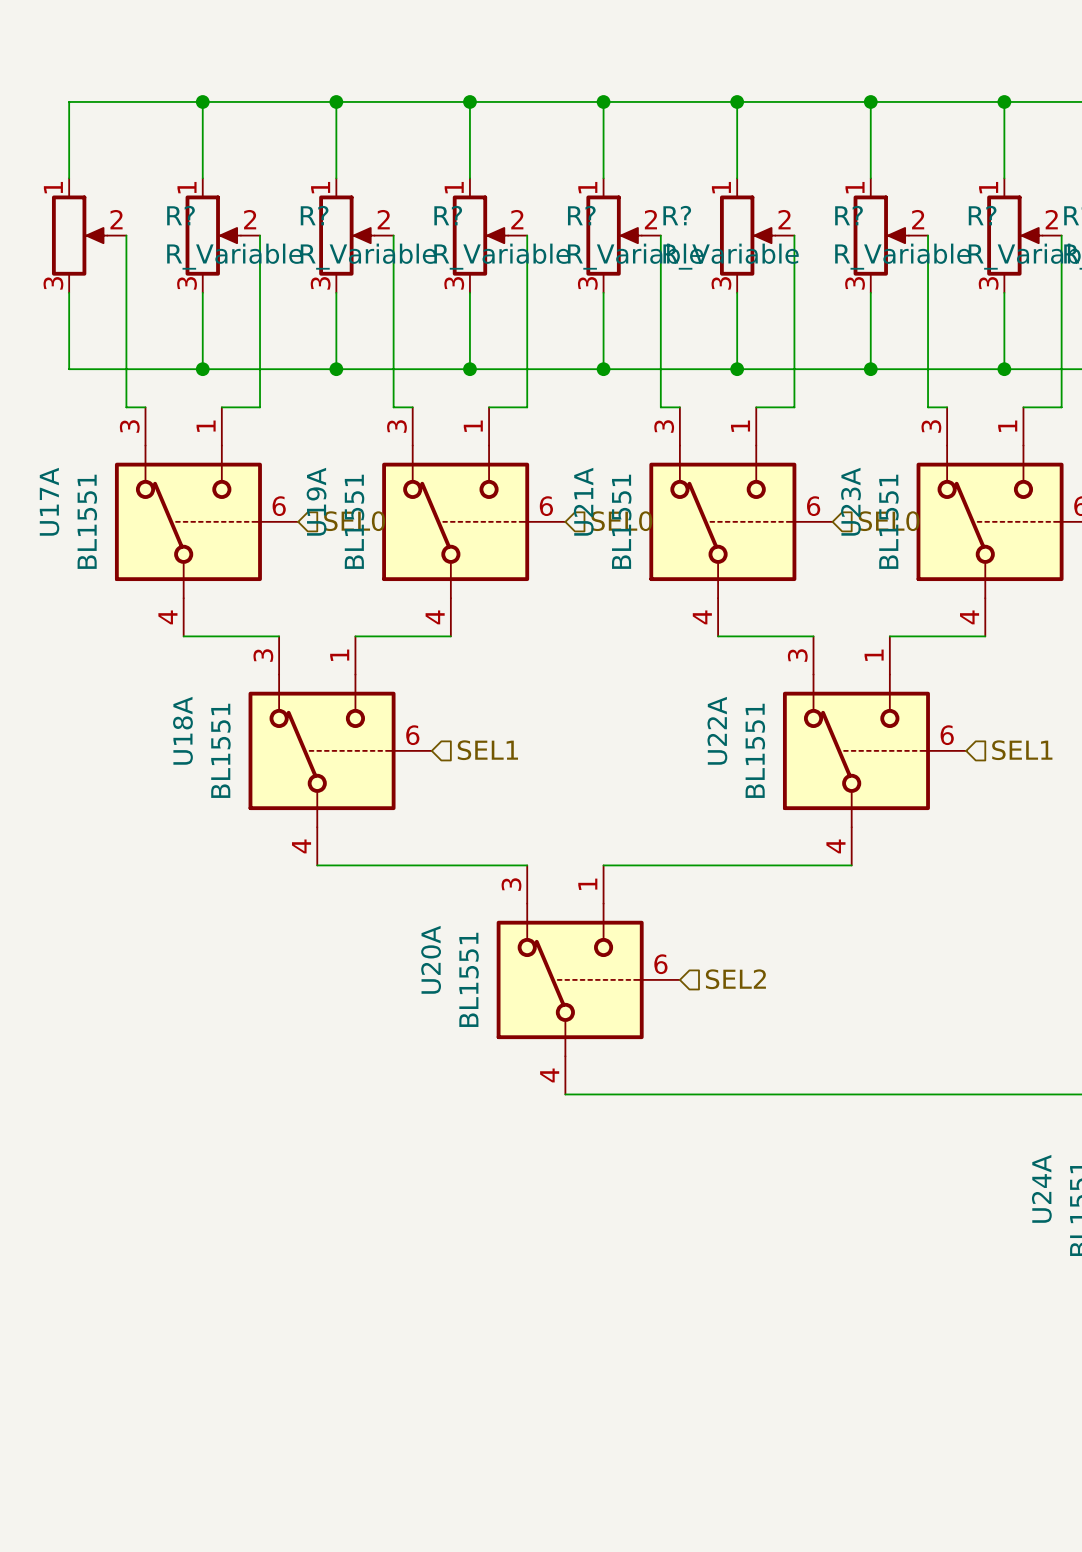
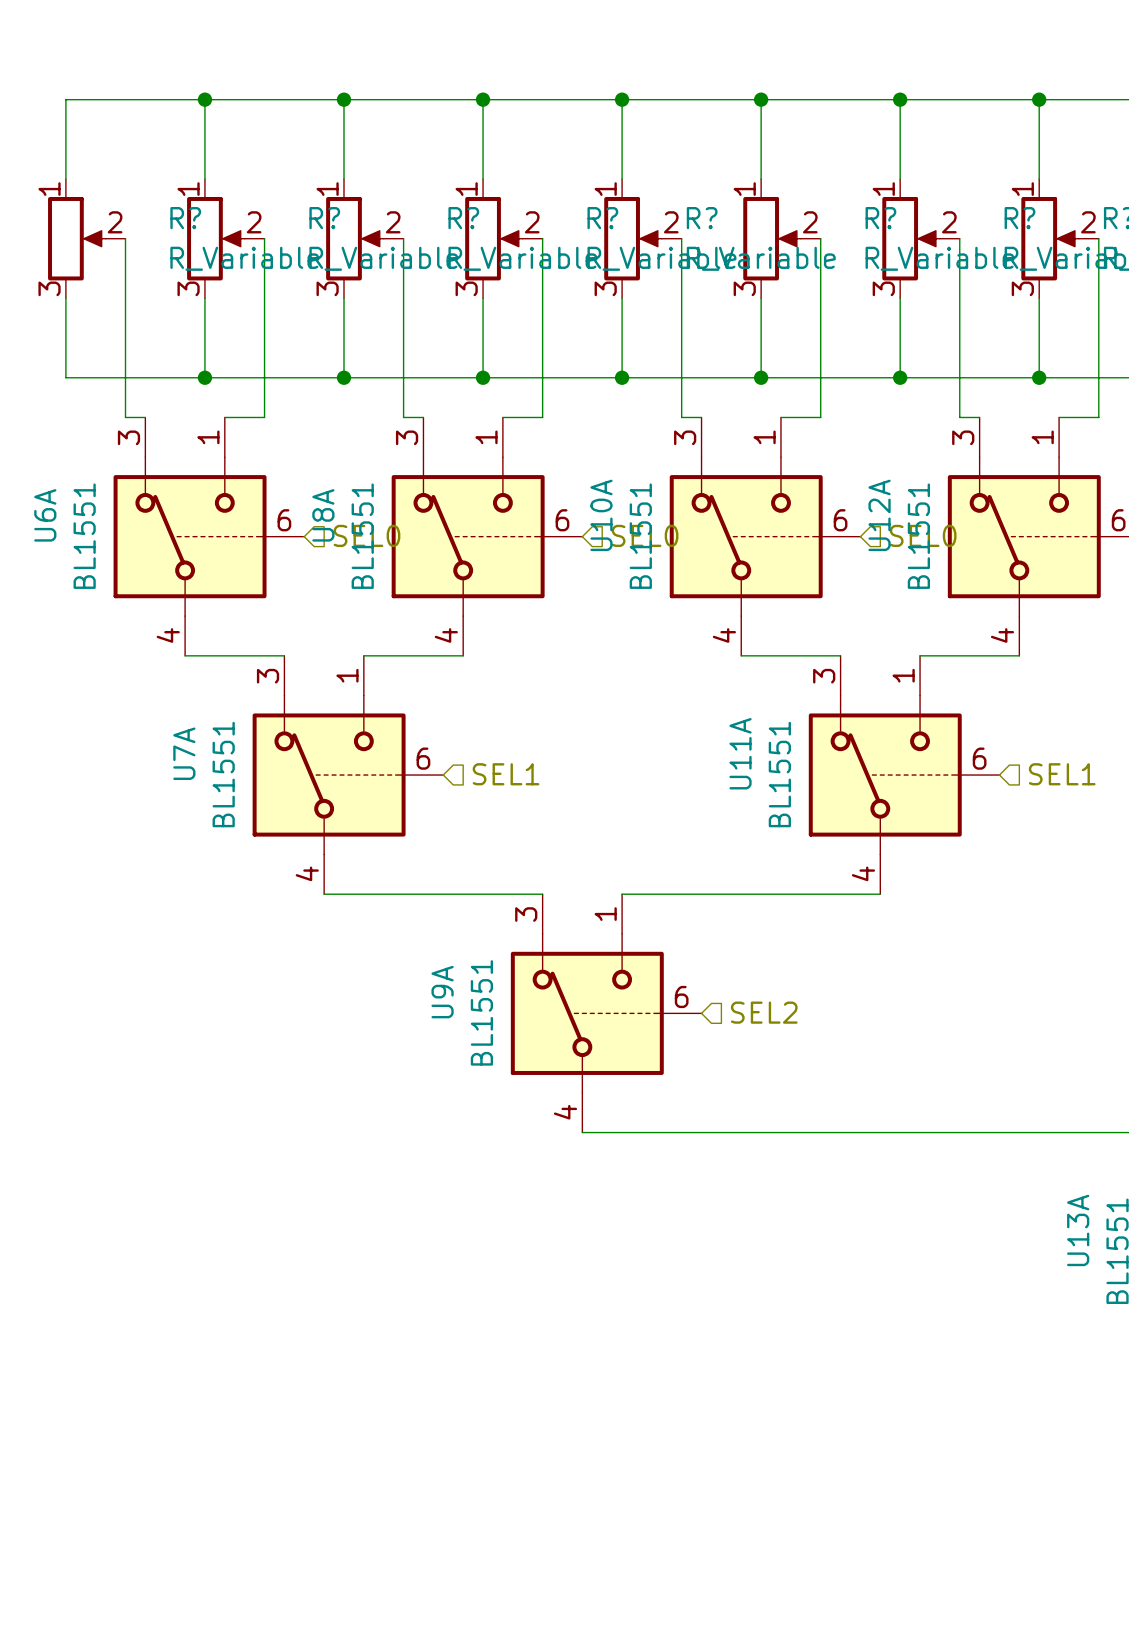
U17A name: U17A (49, 501) -> U6A (45, 515)
U19A name: U19A (316, 501) -> U8A (323, 515)
U21A name: U21A (583, 501) -> U10A (601, 515)
U23A name: U23A (850, 501) -> U12A (879, 515)
U18A name: U18A (182, 730) -> U7A (184, 753)
U22A name: U22A (717, 730) -> U11A (740, 753)
U20A name: U20A (431, 959) -> U9A (442, 992)
U24A name: U24A (1041, 1188) -> U13A (1078, 1230)

